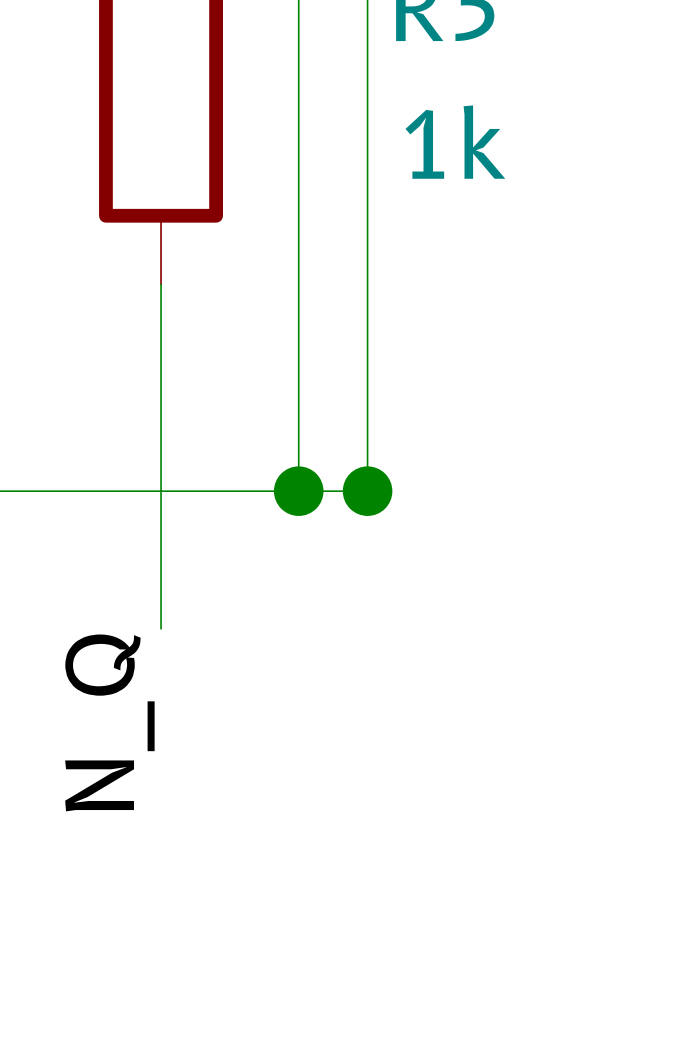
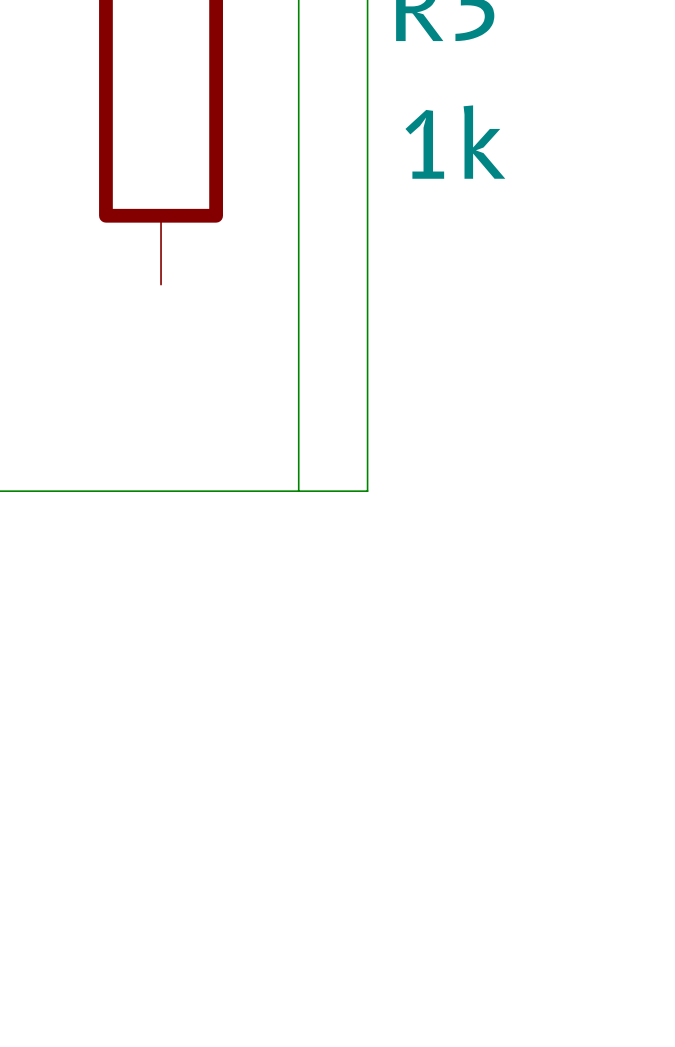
wire: (161, 284) (161, 628) -> none
junction: (298, 491) -> none
junction: (367, 491) -> none
label: N_Q (109, 722) -> none

